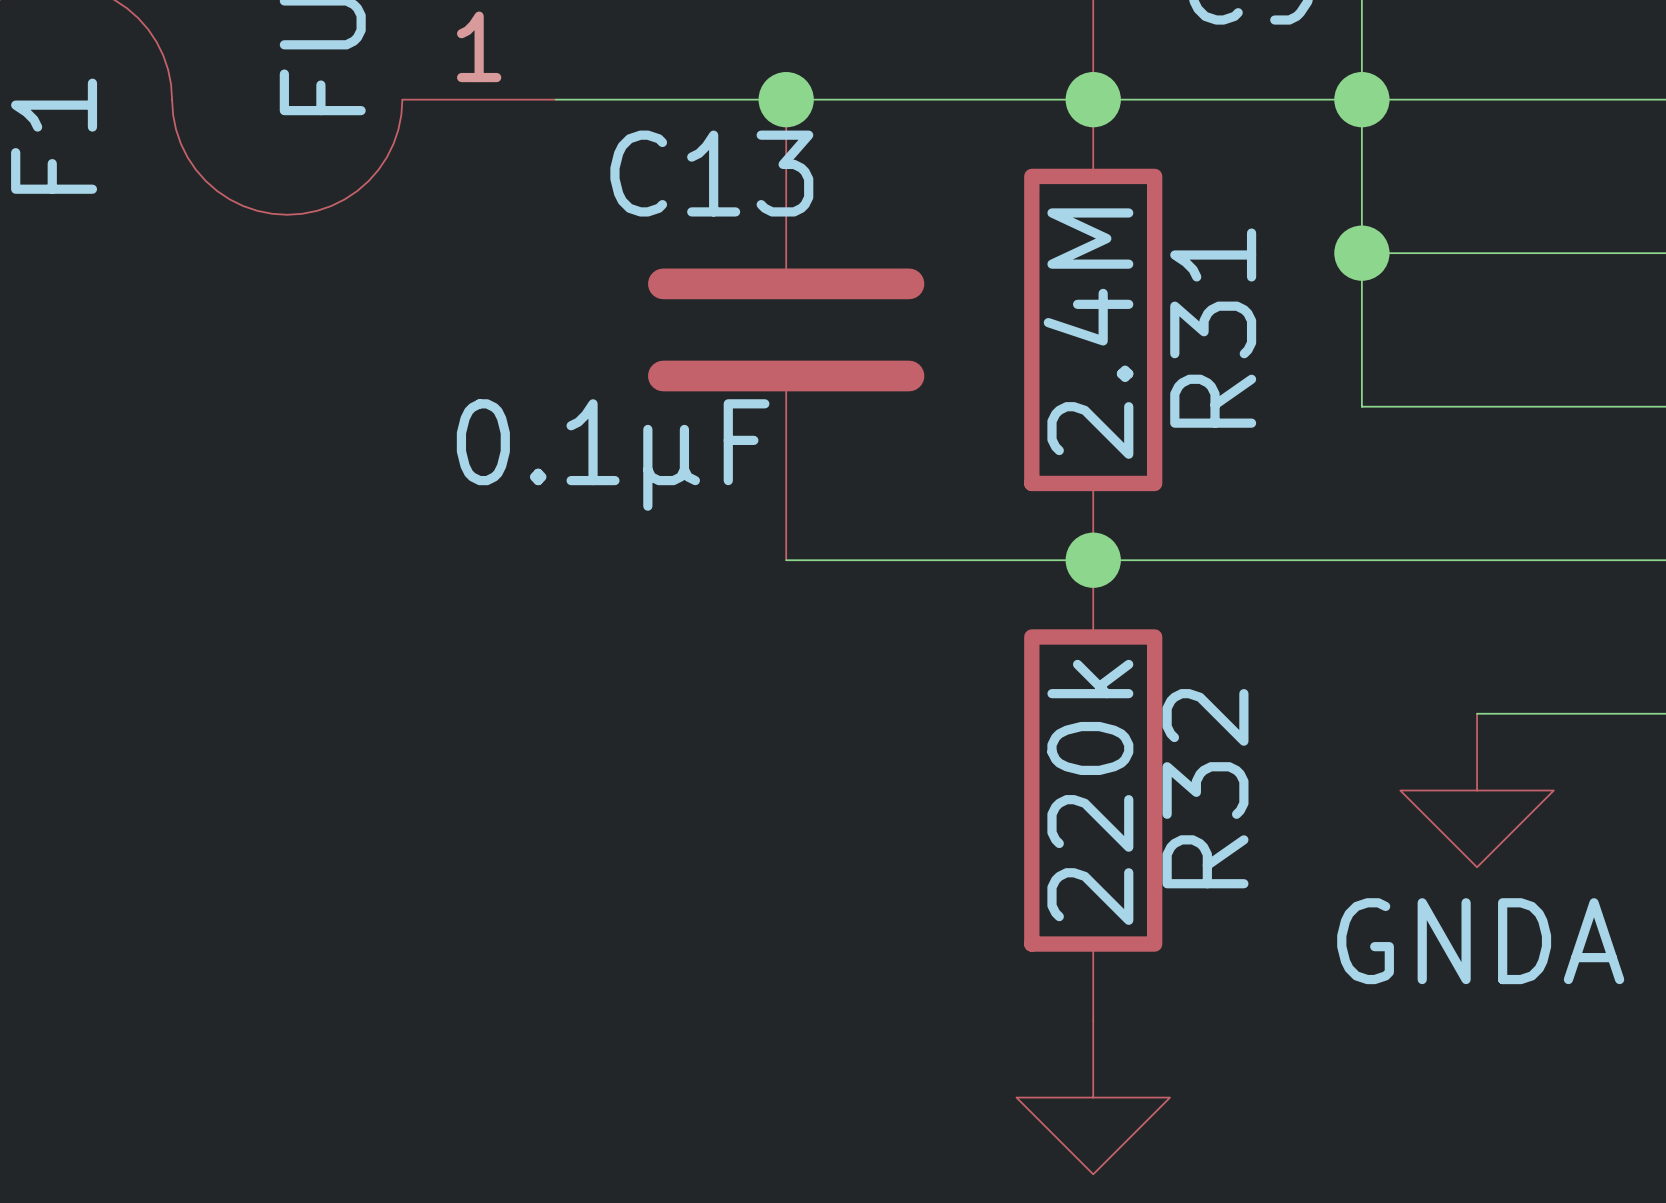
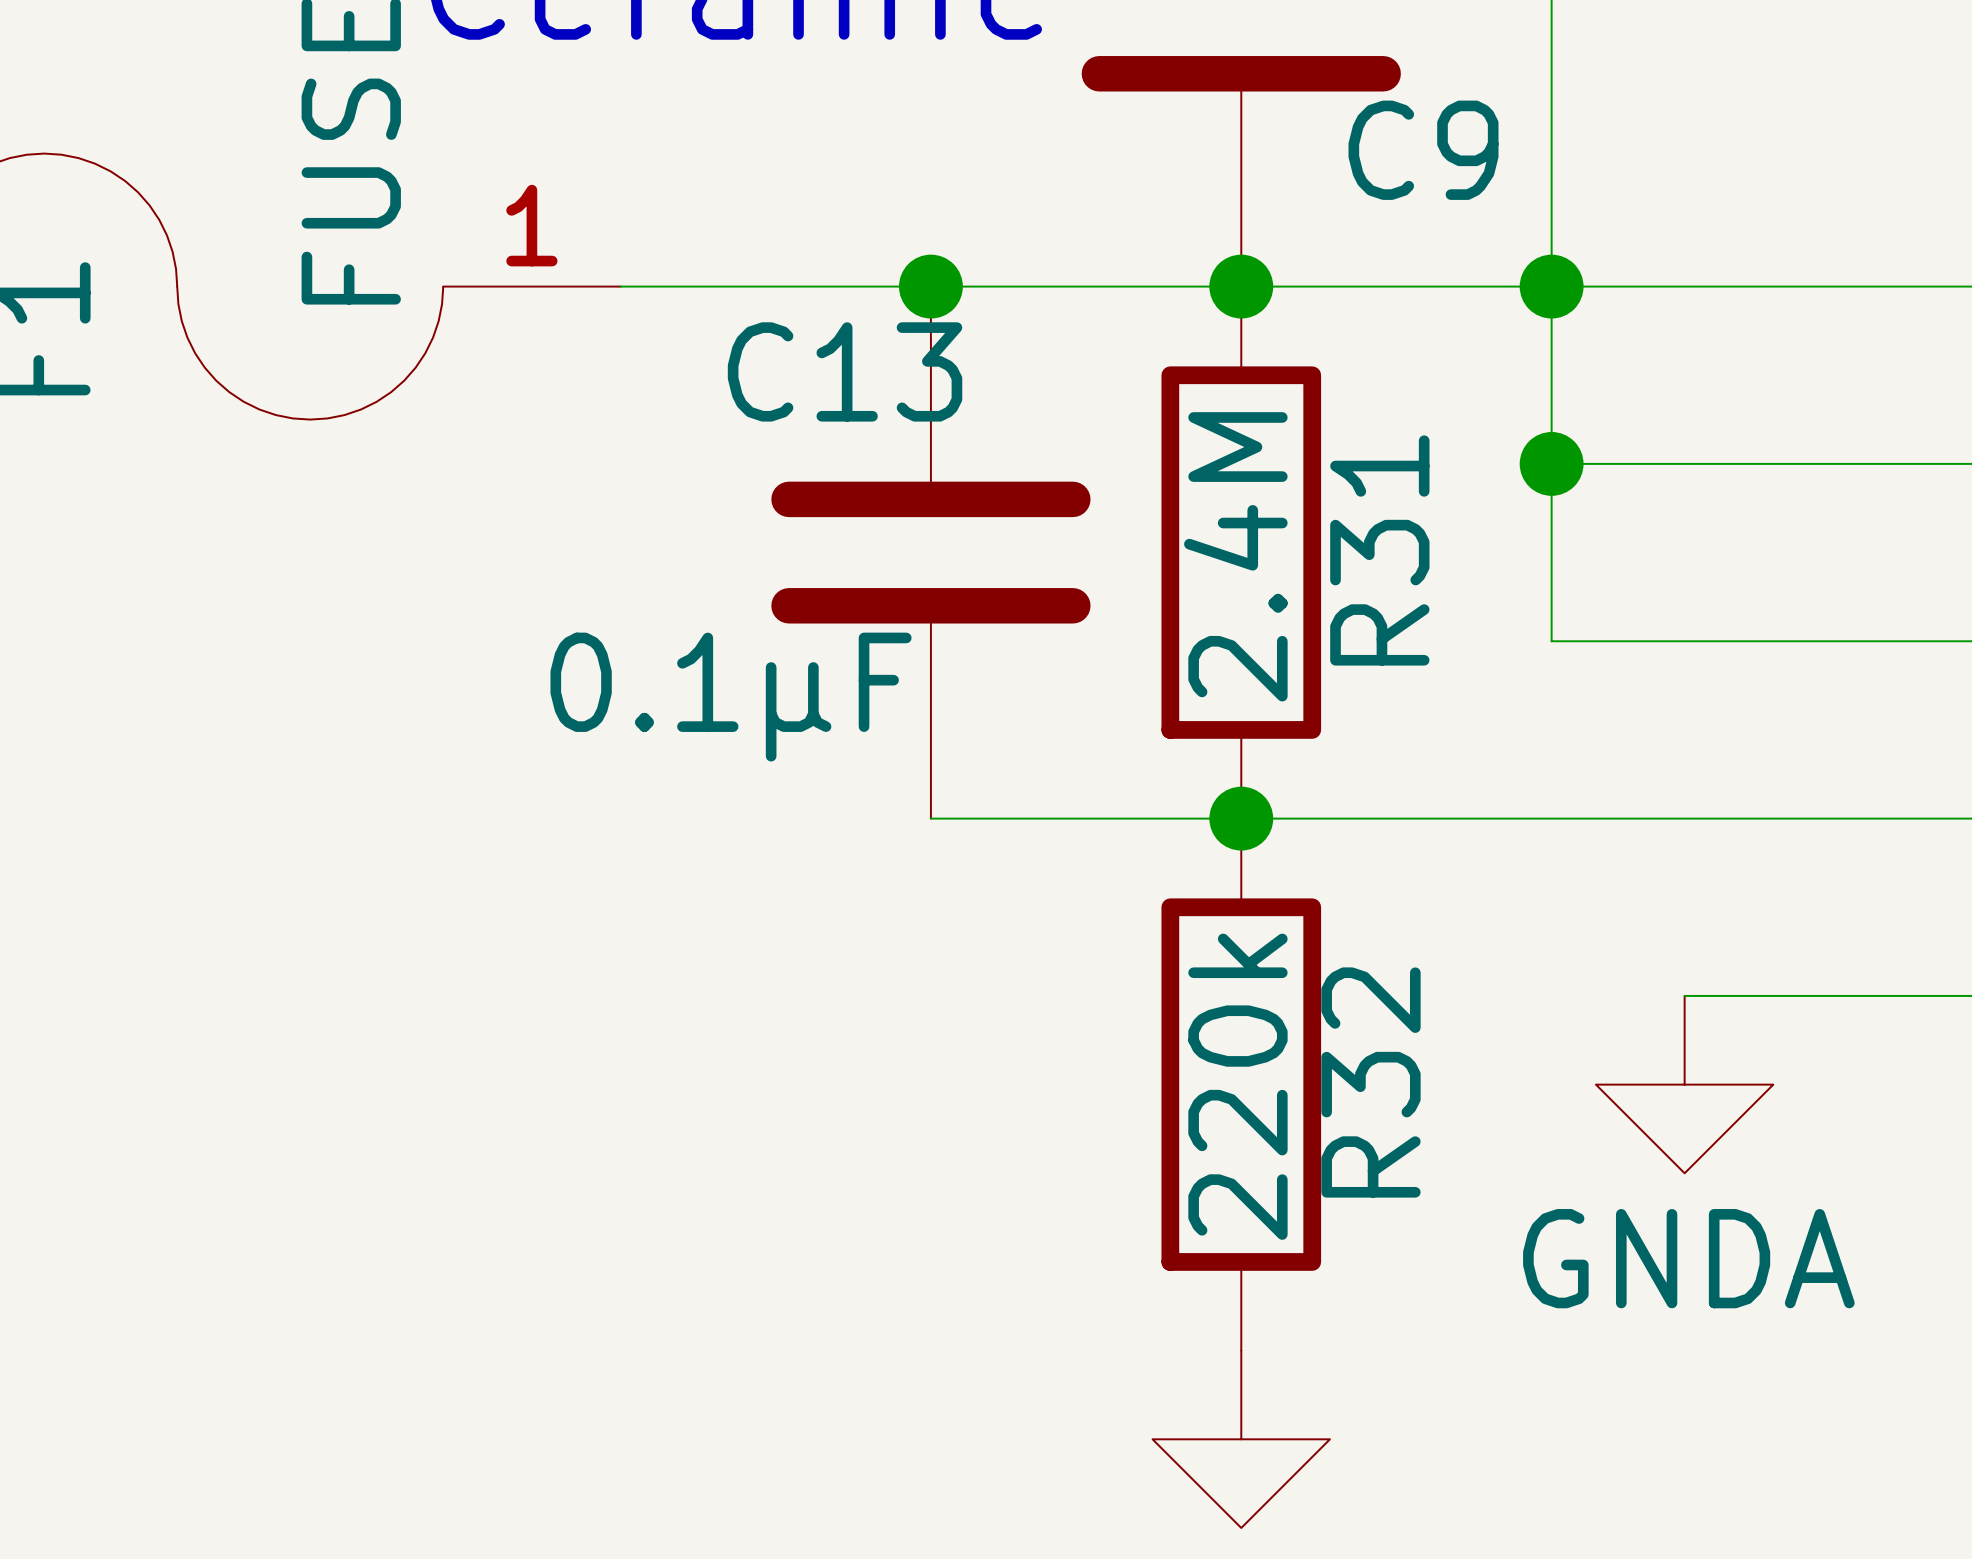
junction position: (786, 99) -> (930, 286)
C13 position: (786, 329) -> (930, 552)
wire: (786, 560) (824, 560) -> none

